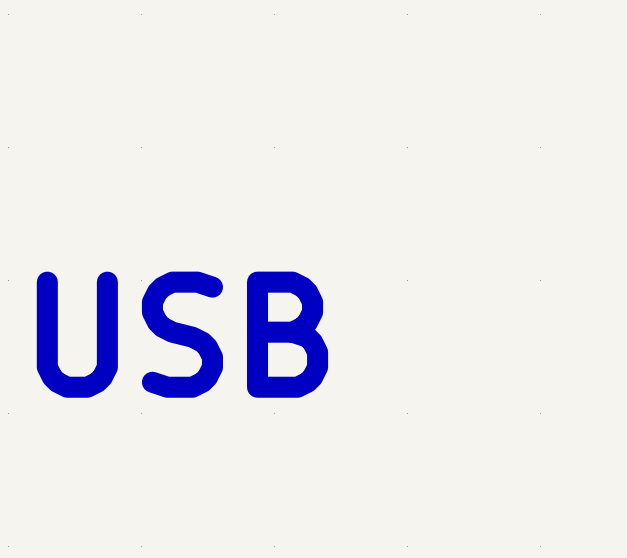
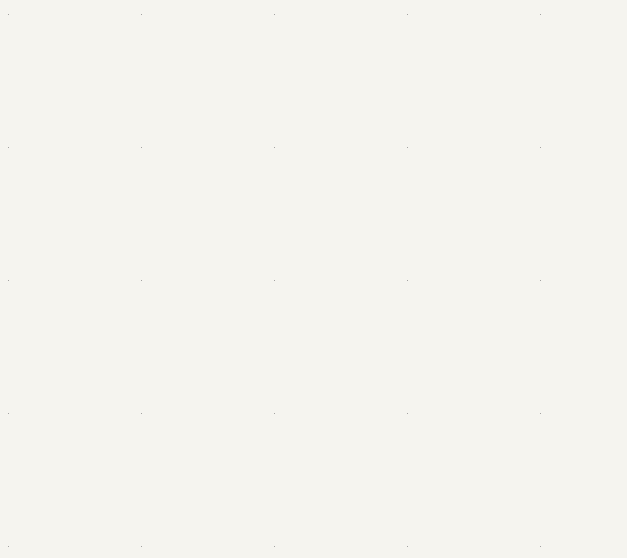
text: USB (182, 334) -> none

